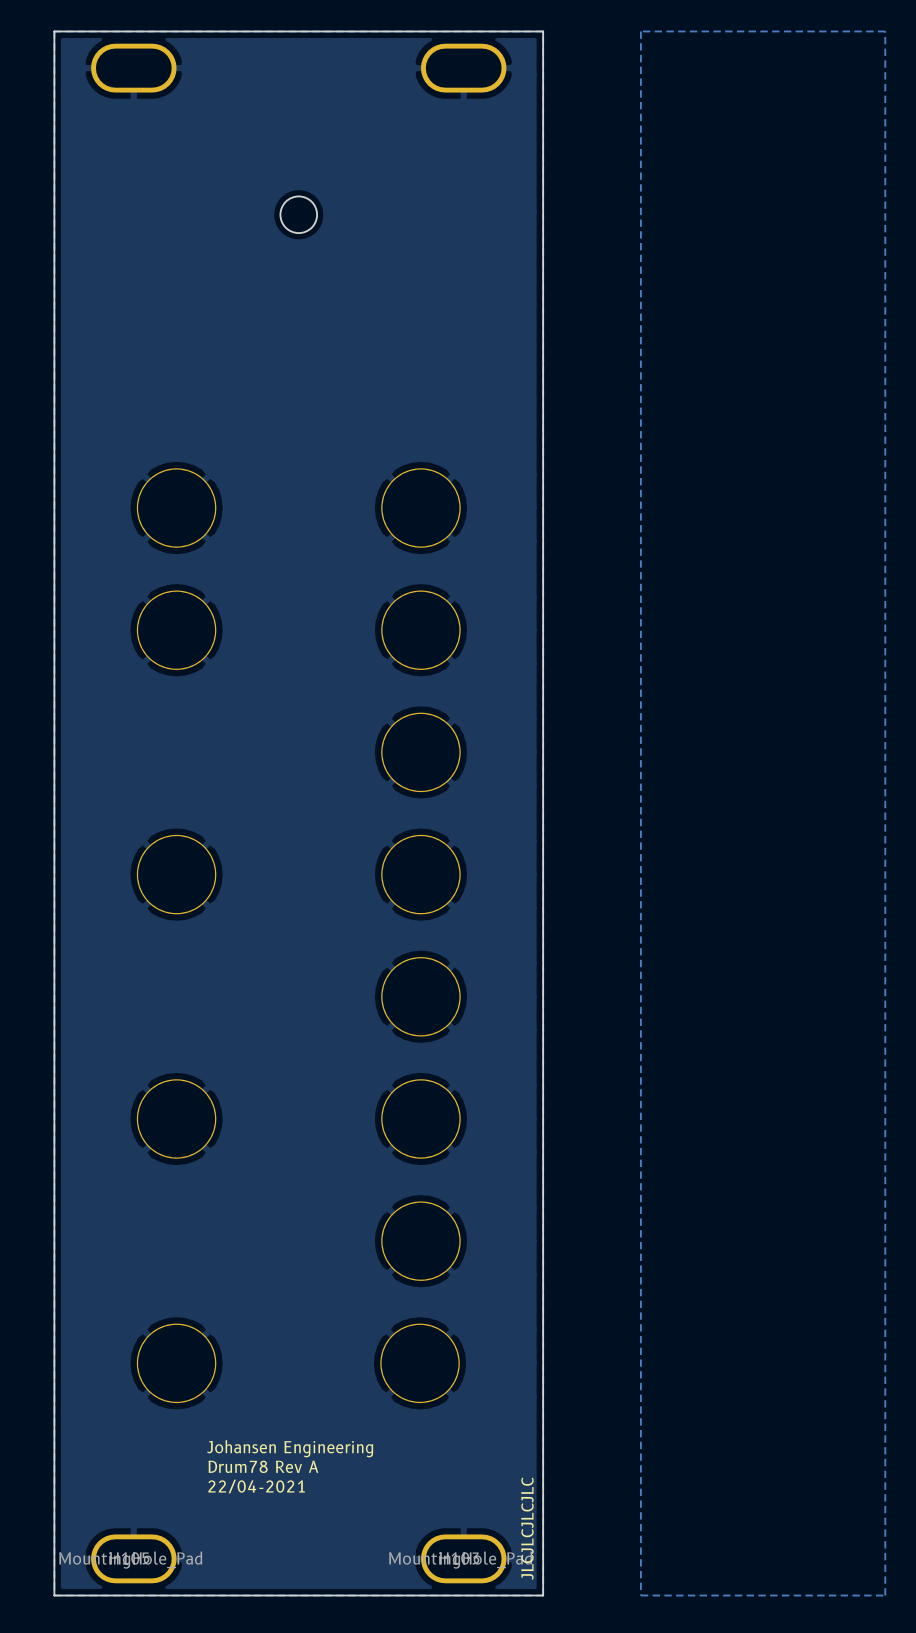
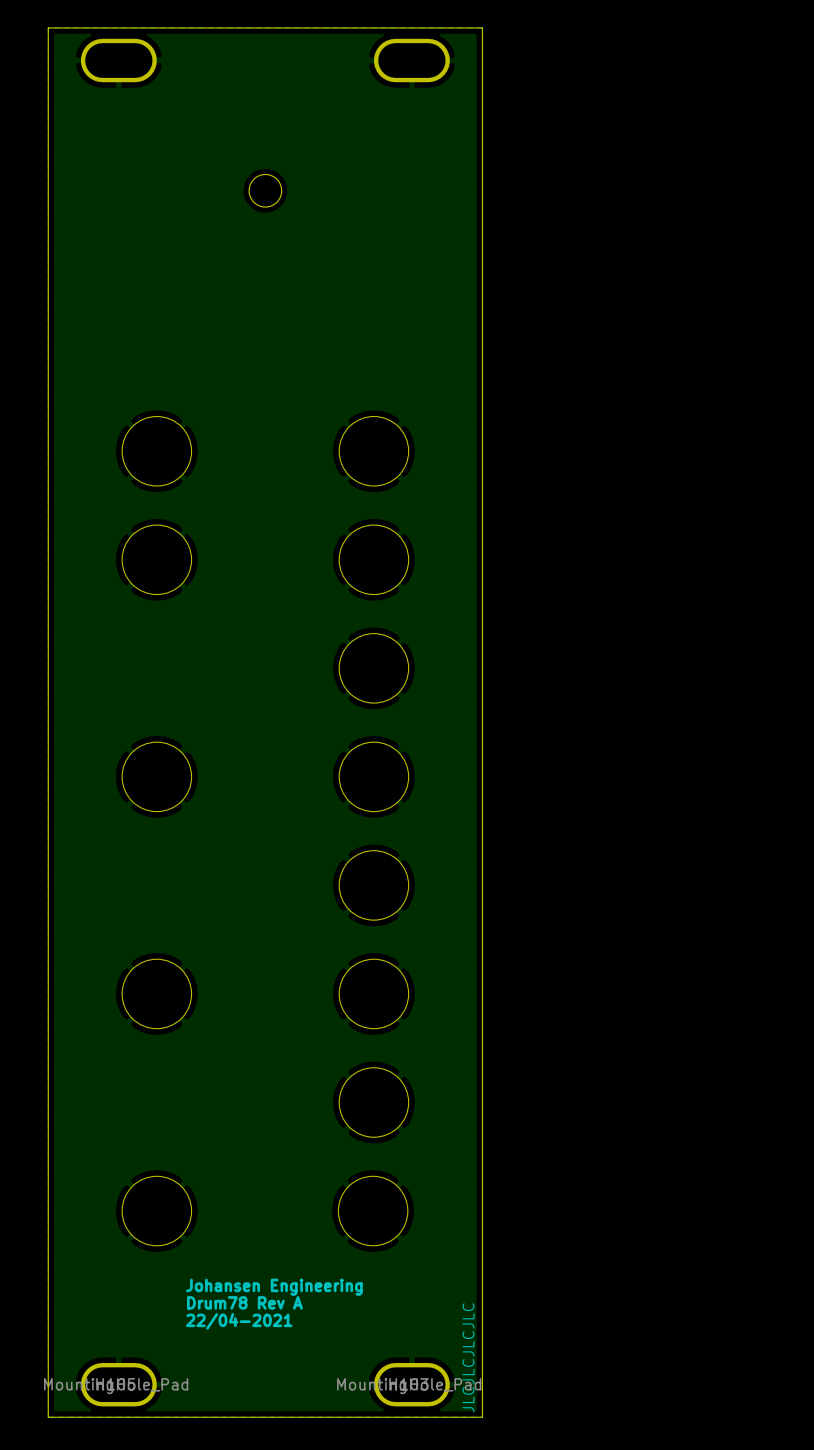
zone outline: (885, 31) (640, 31) (640, 1595) (885, 1595) (885, 31) -> none

